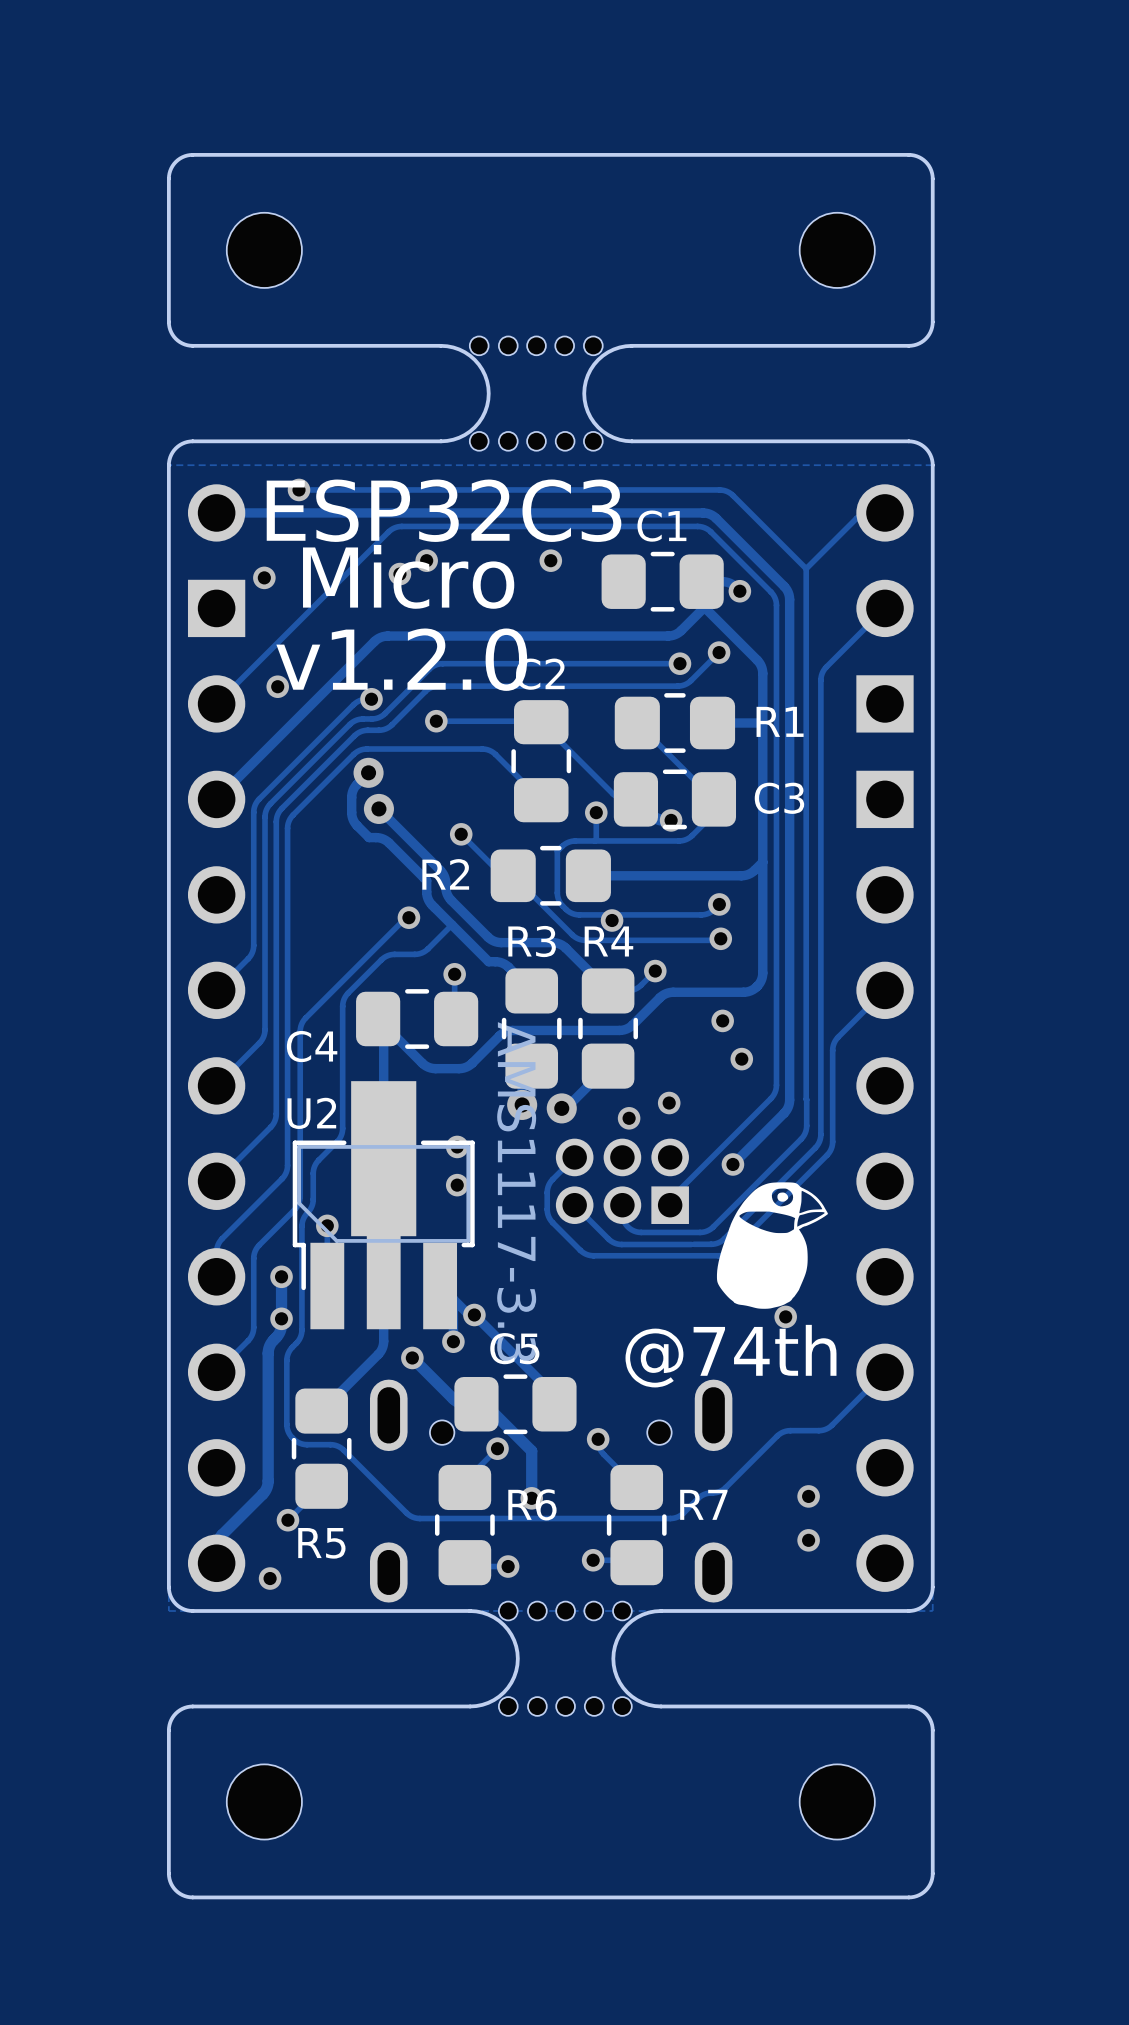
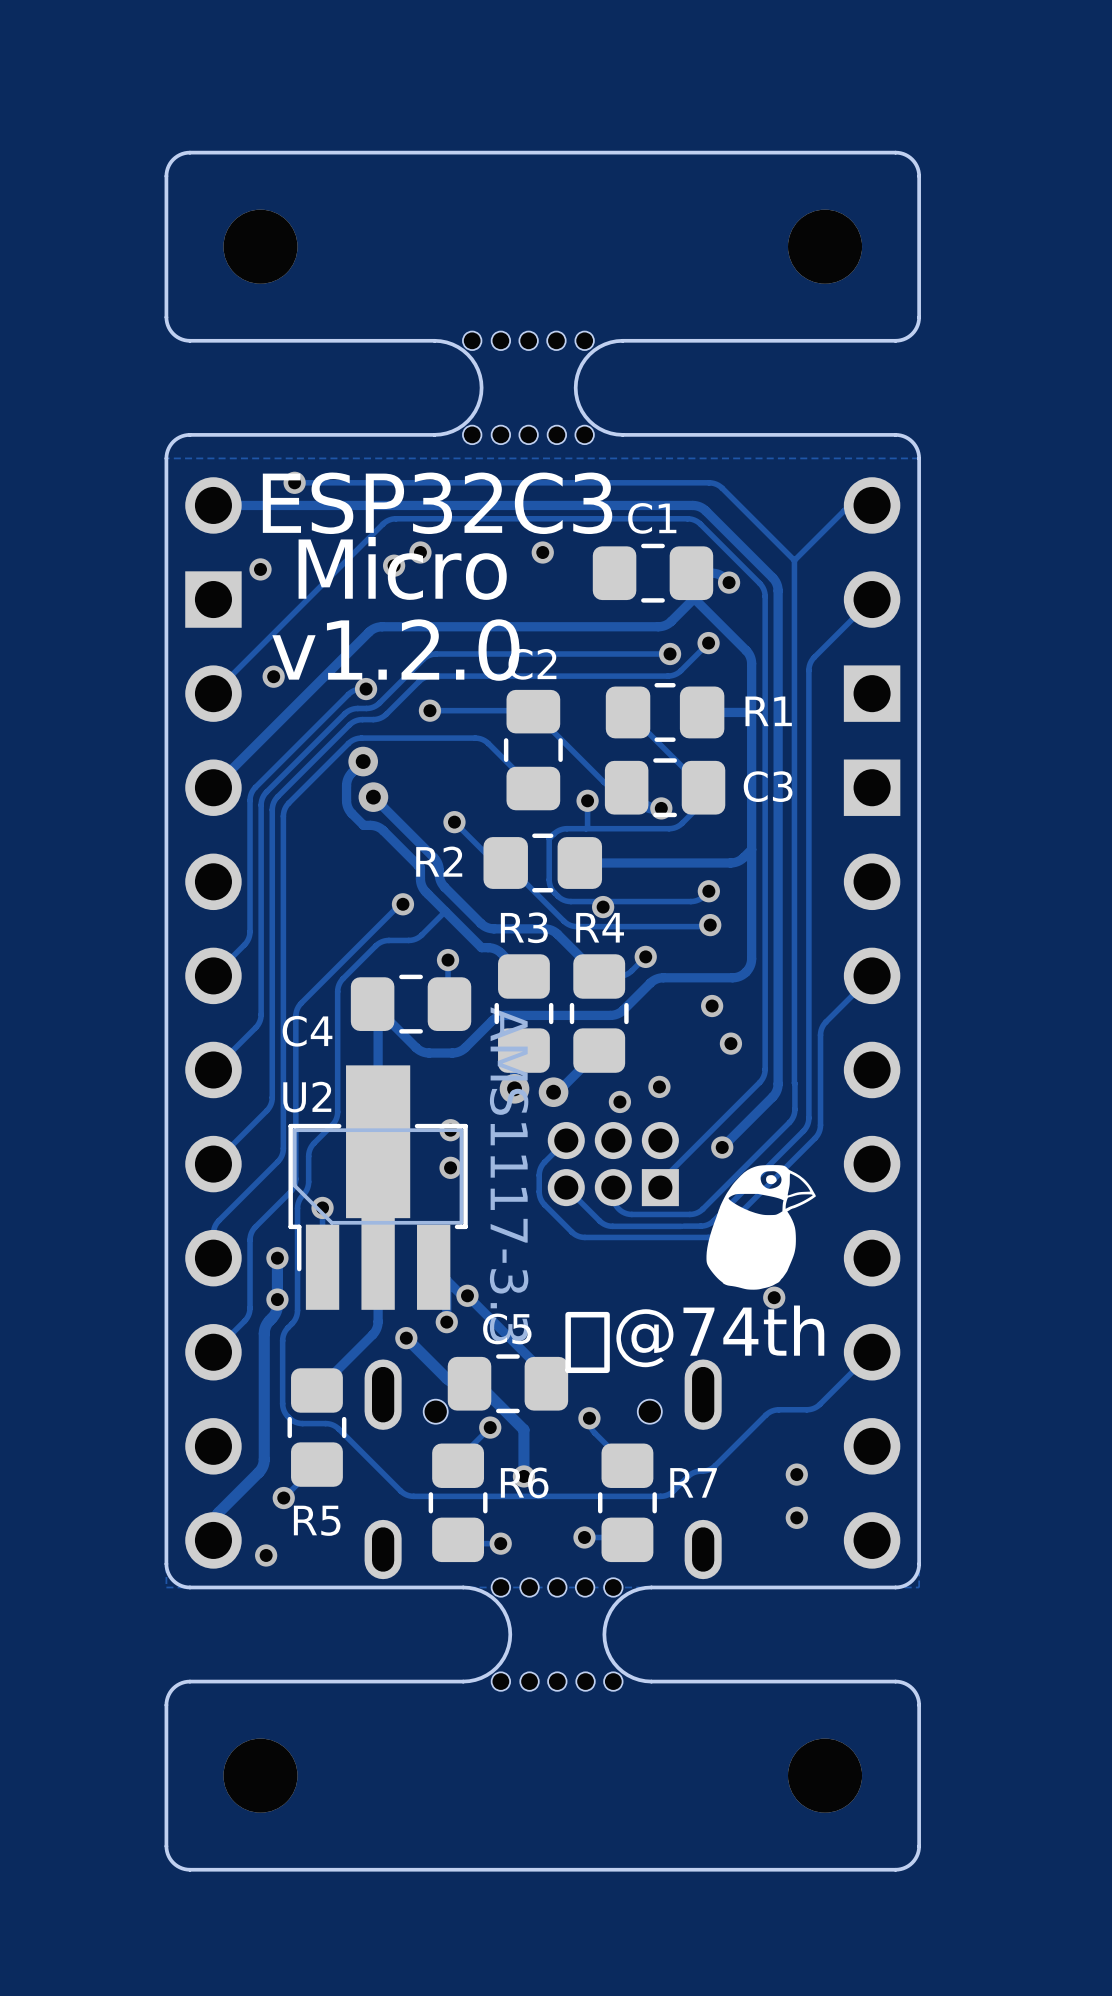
part footprint: [226, 212, 302, 288] -> [223, 209, 298, 284]
part footprint: [799, 212, 875, 288] -> [787, 209, 863, 284]
drawing shape: [625, 1324, 837, 1388] -> [565, 1305, 825, 1374]
part footprint: [226, 1764, 302, 1840] -> [223, 1738, 298, 1813]
part footprint: [799, 1764, 875, 1840] -> [787, 1738, 863, 1813]

